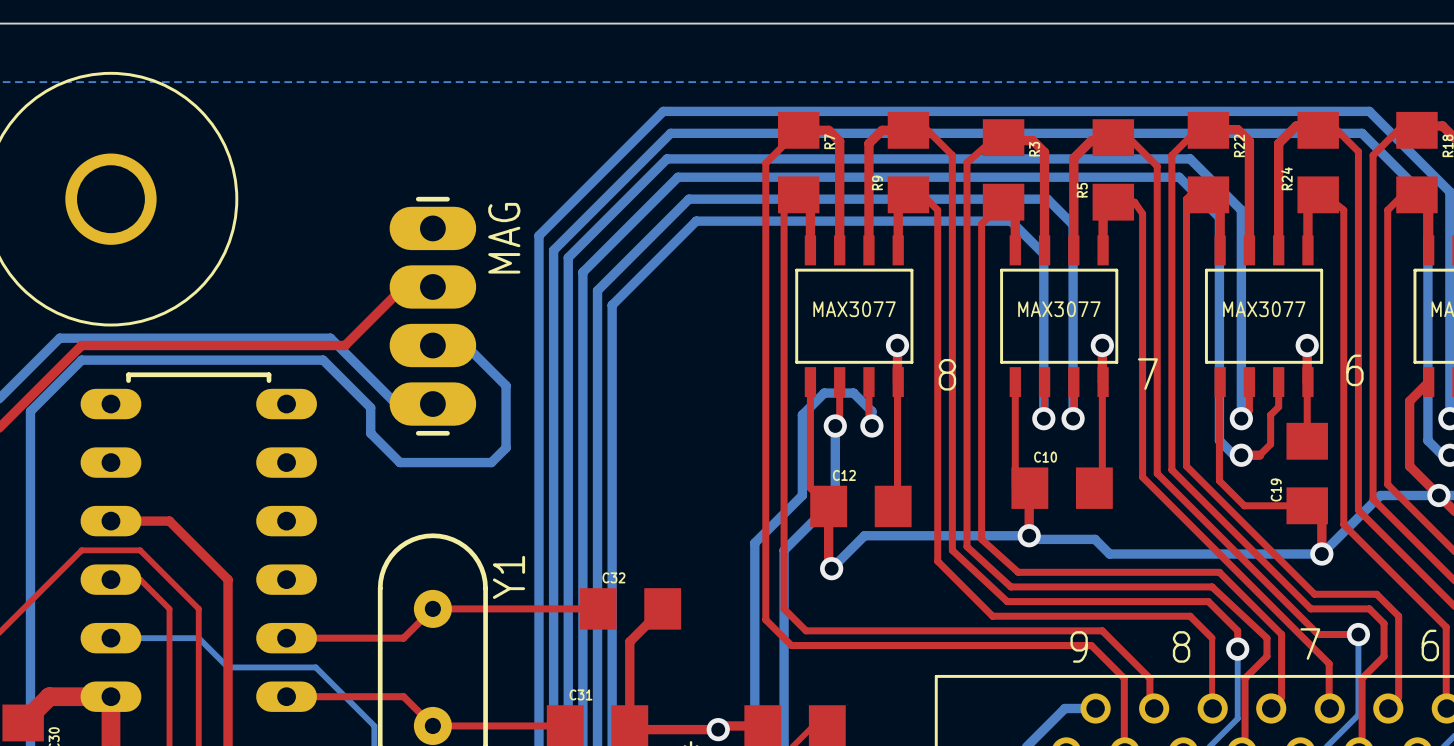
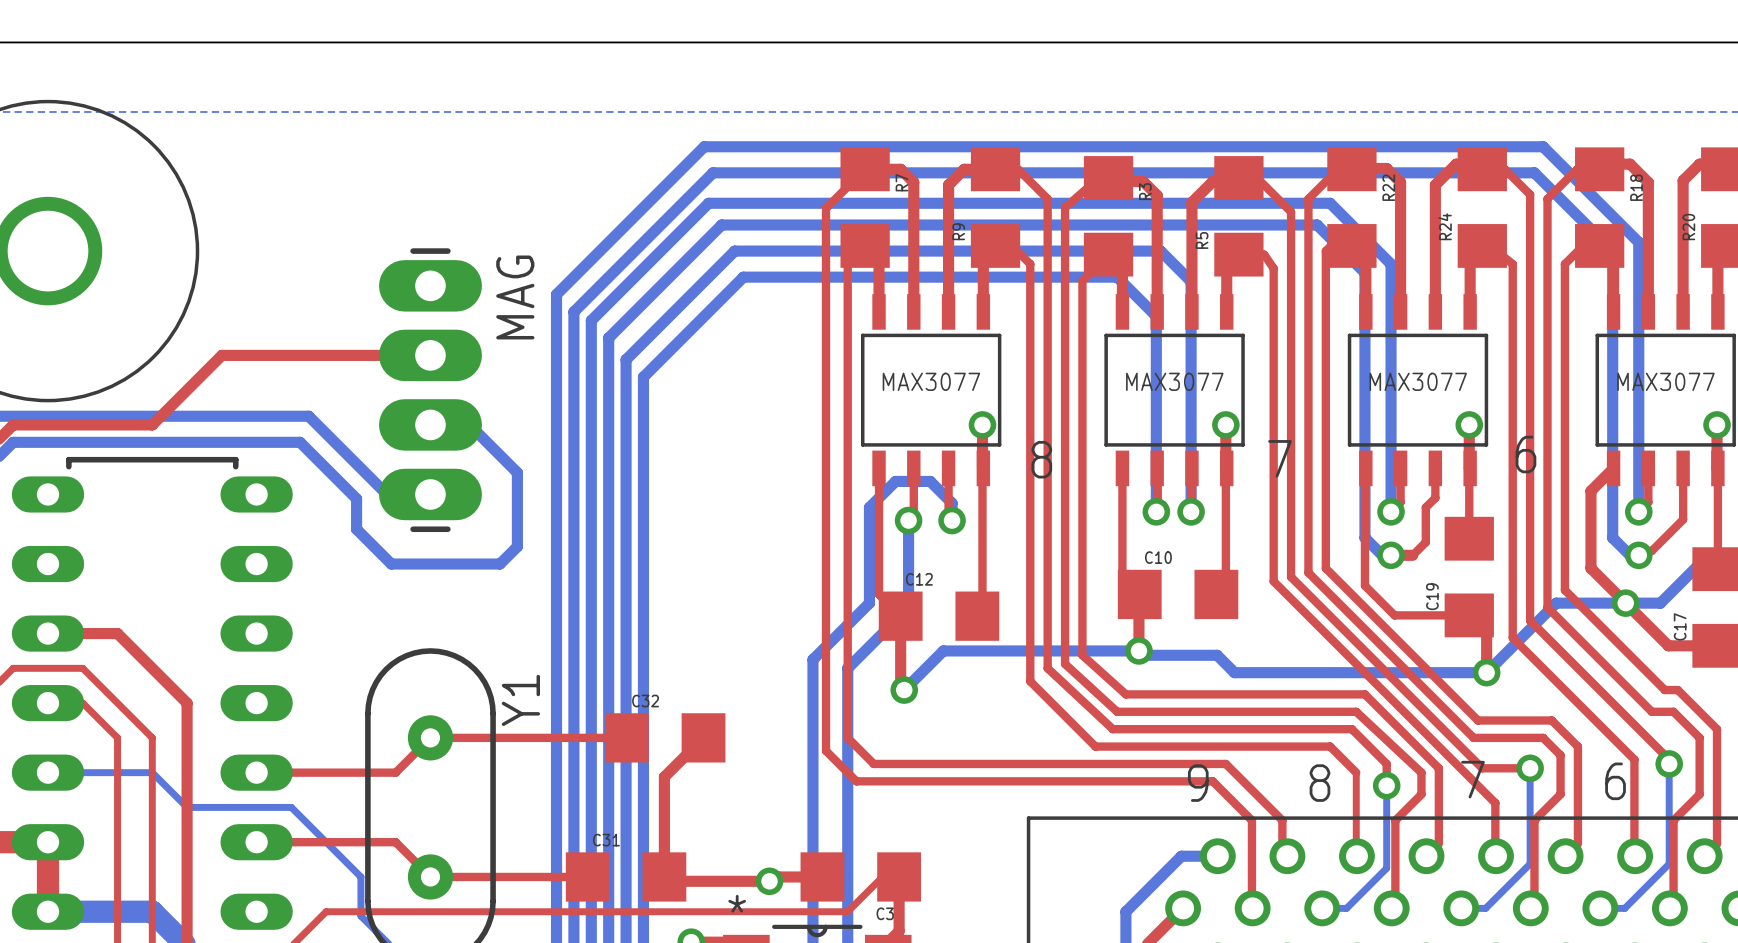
top track: (403, 286) (345, 345) (198, 345) -> (395, 355) (221, 355) (152, 424)

